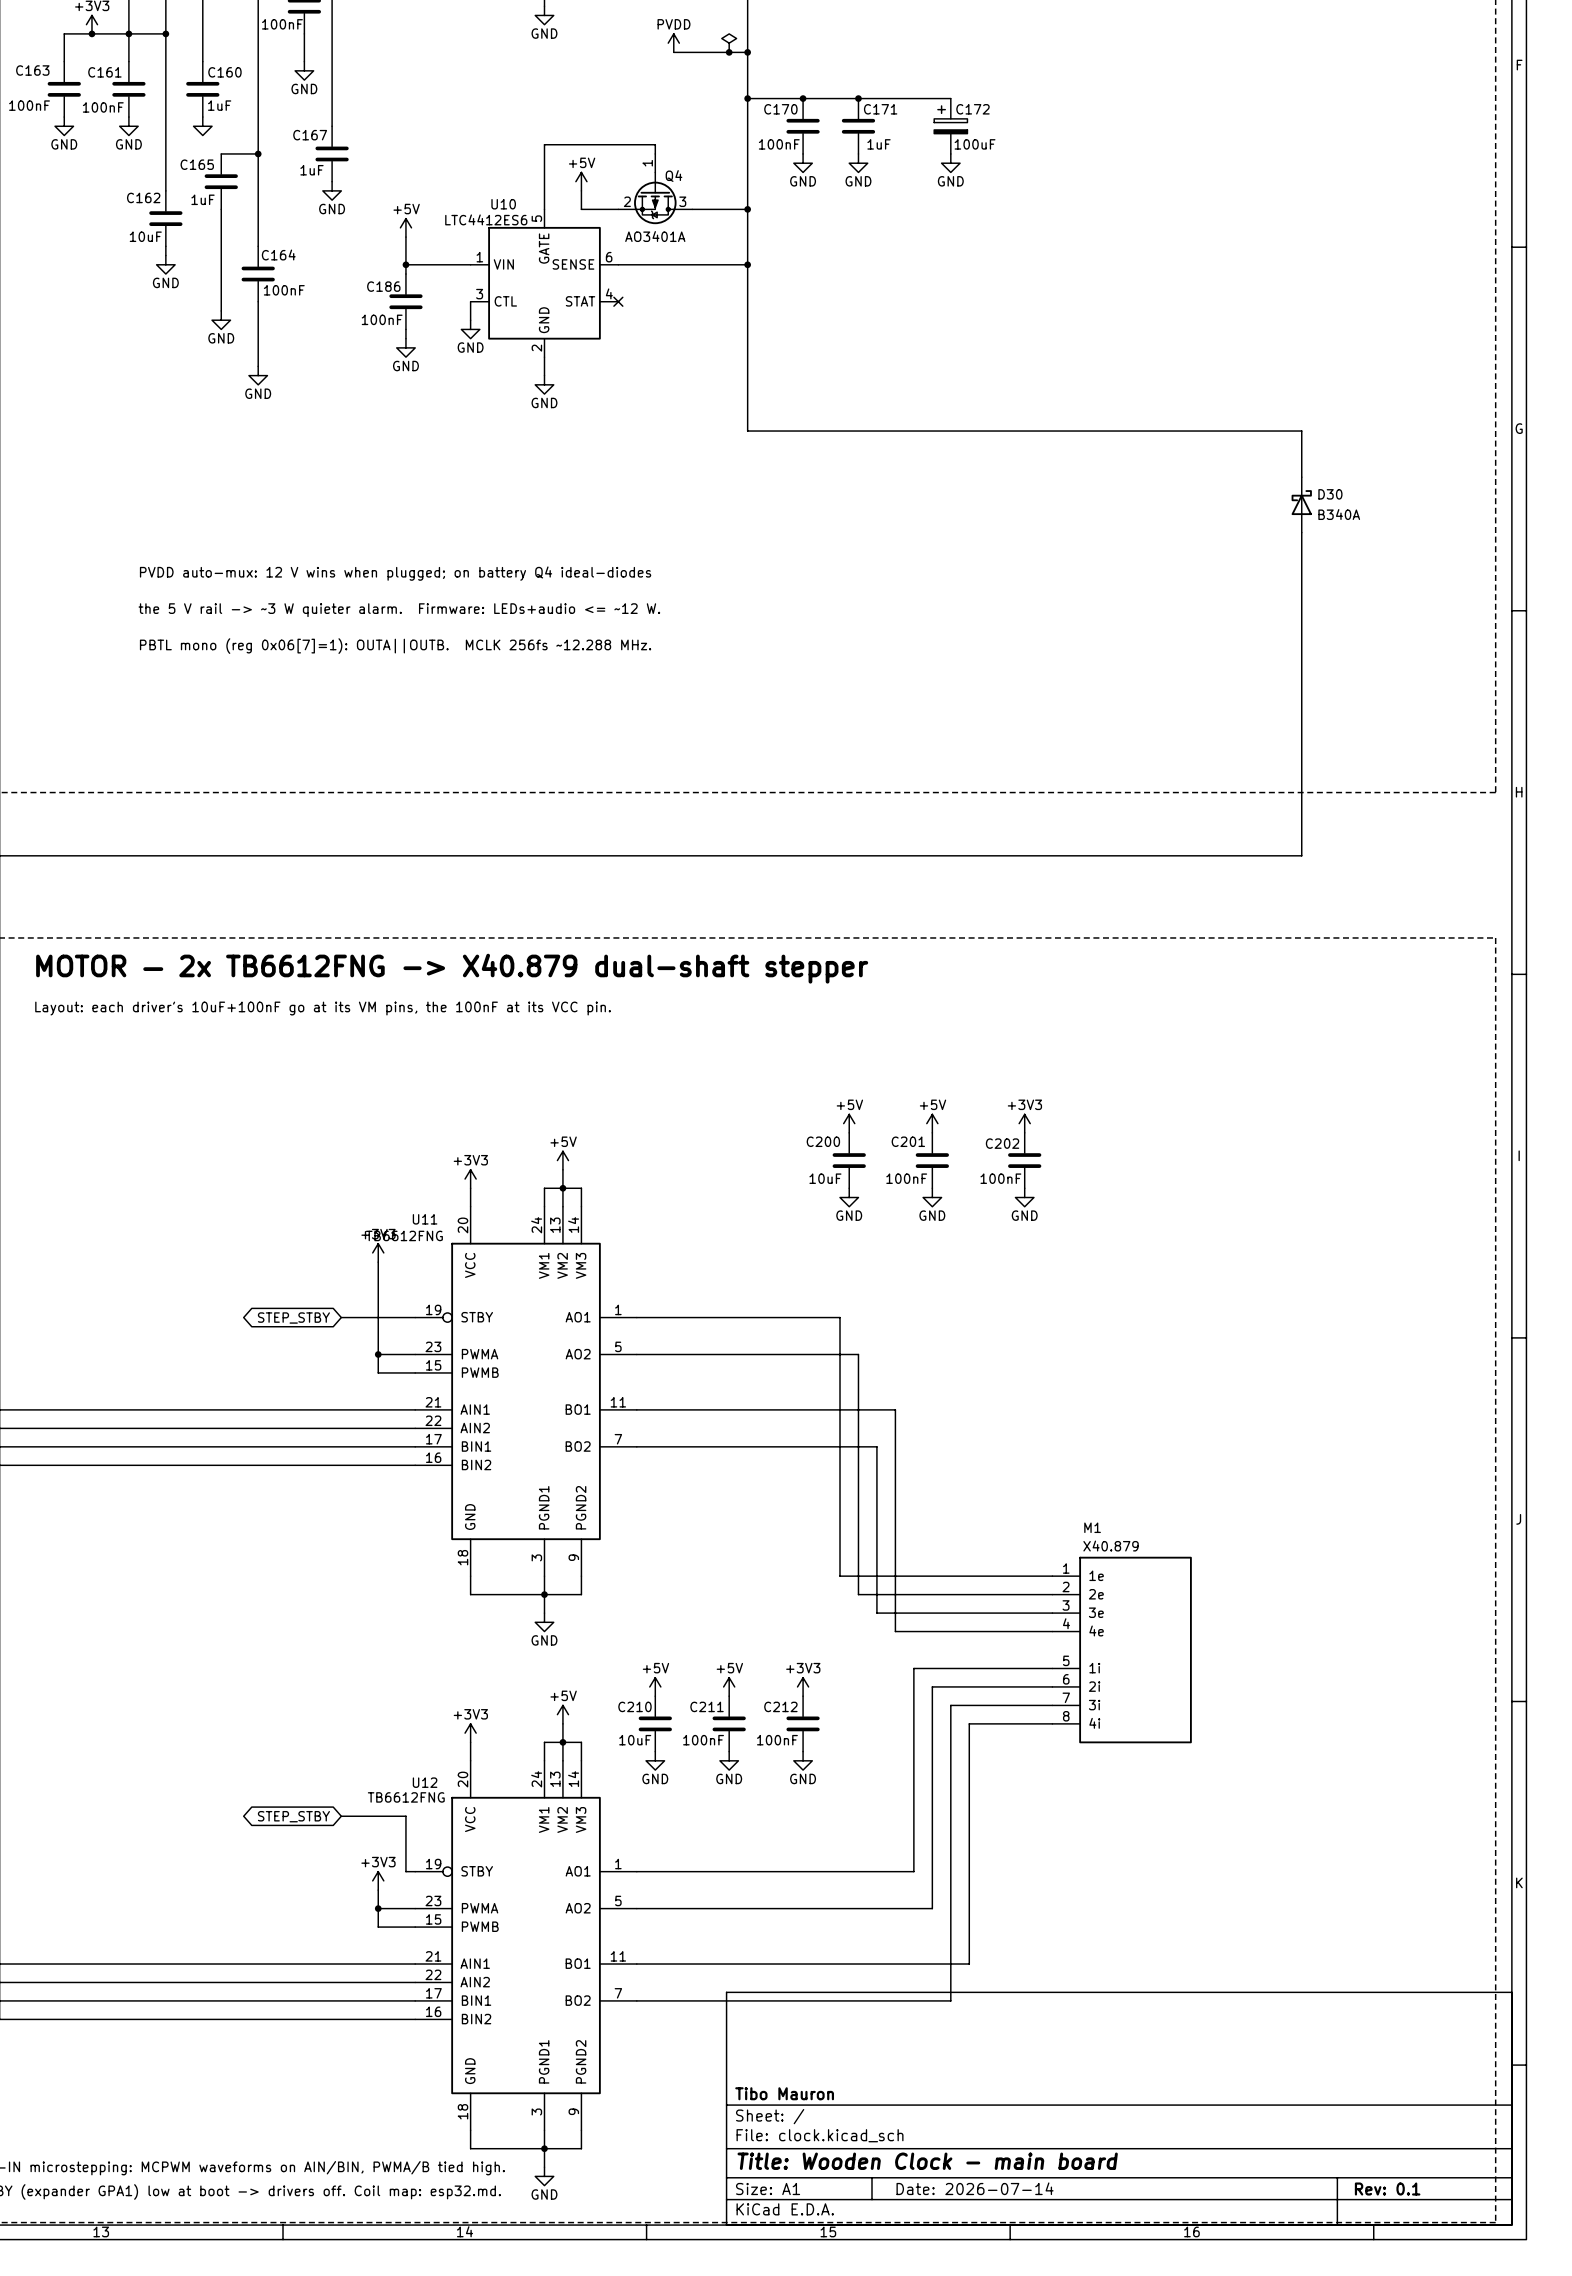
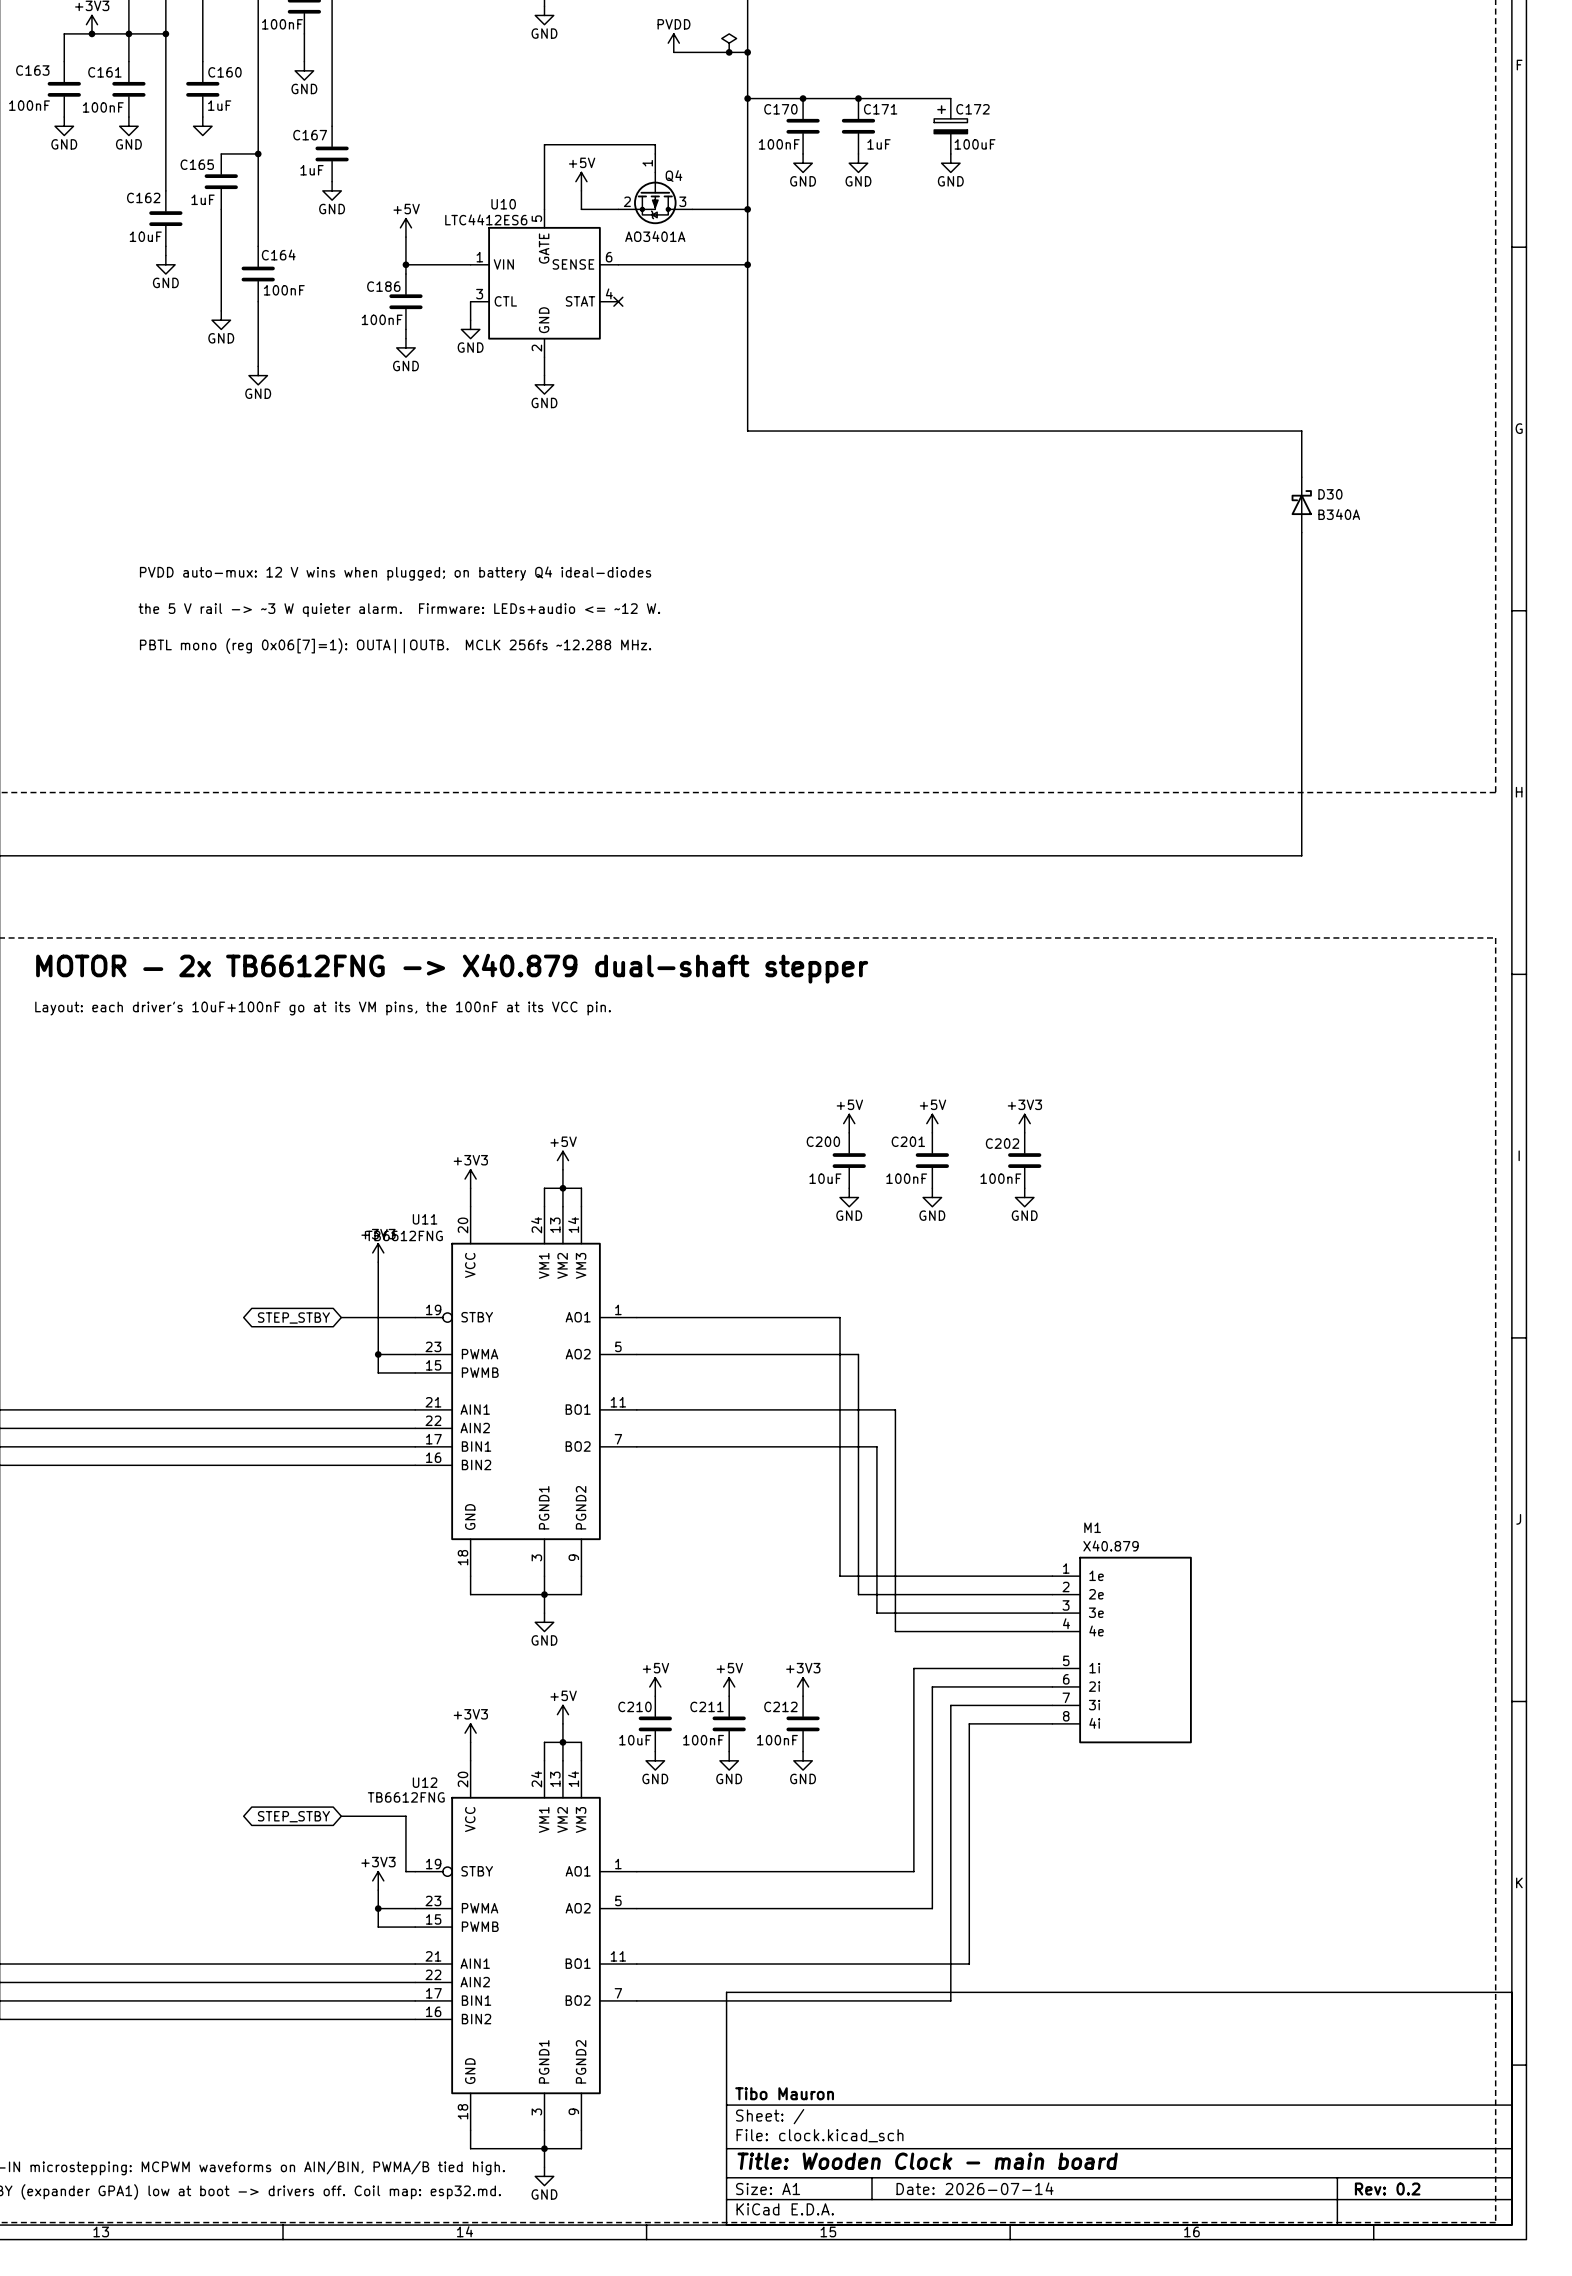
title block: Rev: 0.1 (1387, 2189) -> Rev: 0.2 (1387, 2189)

